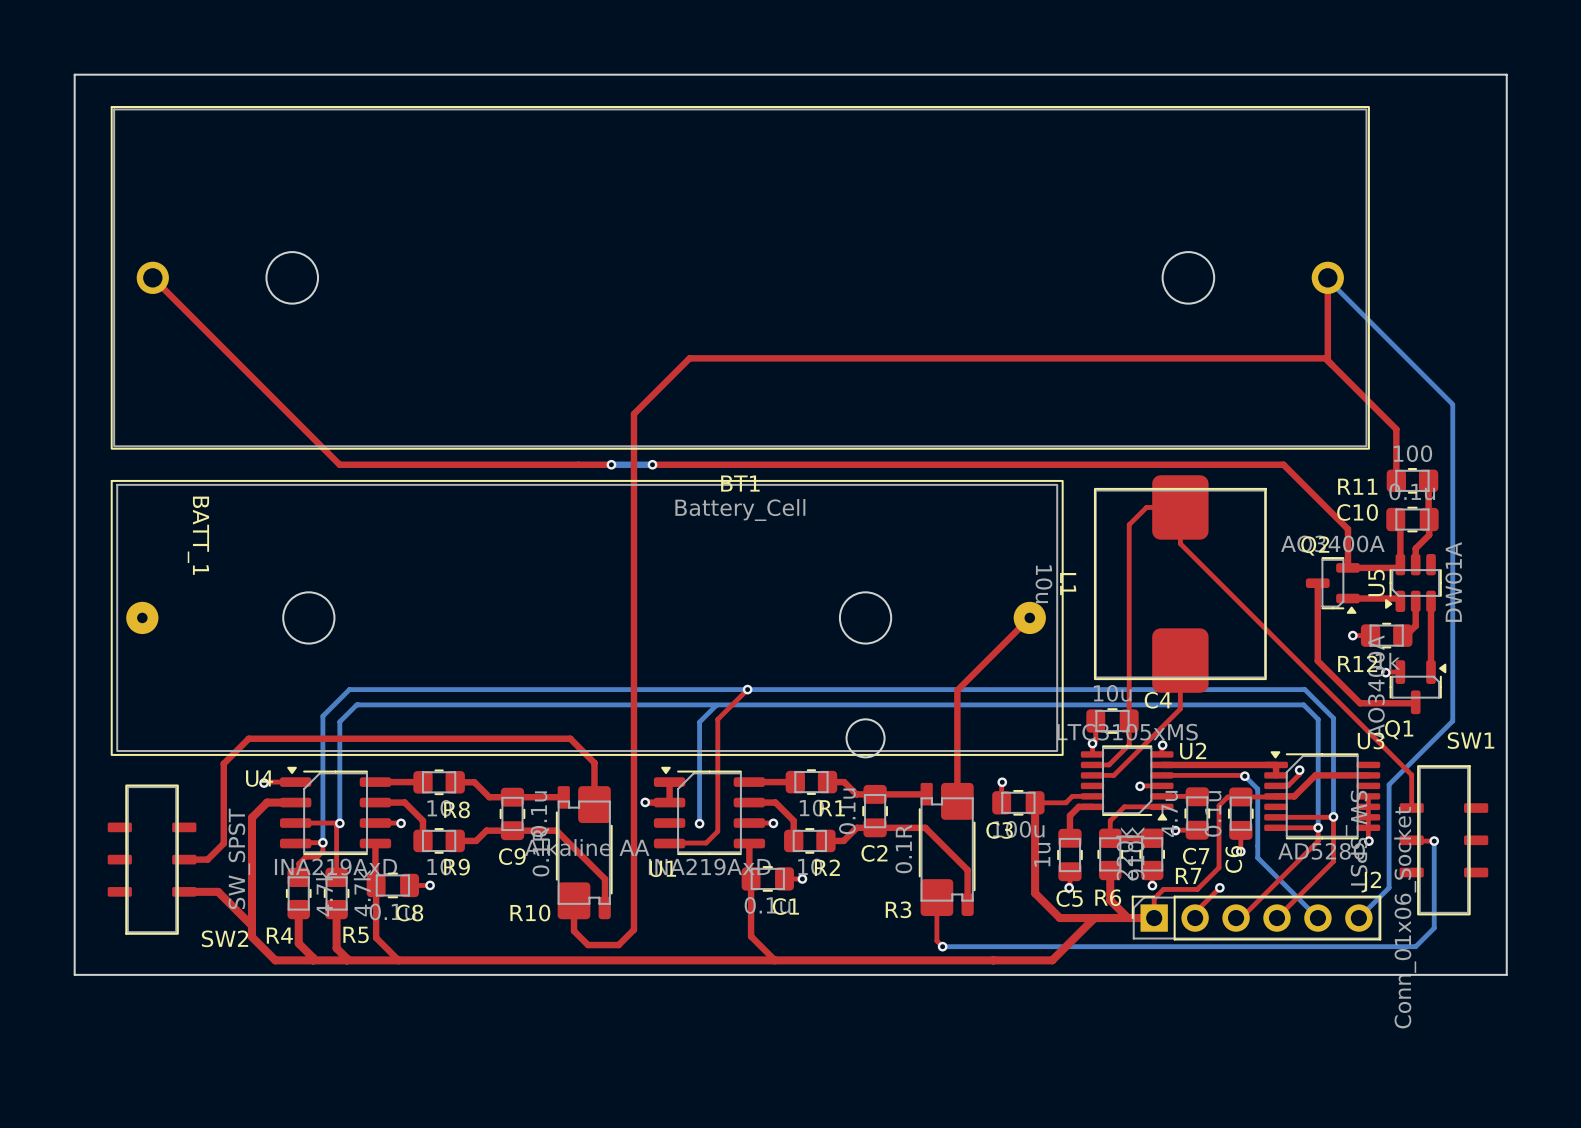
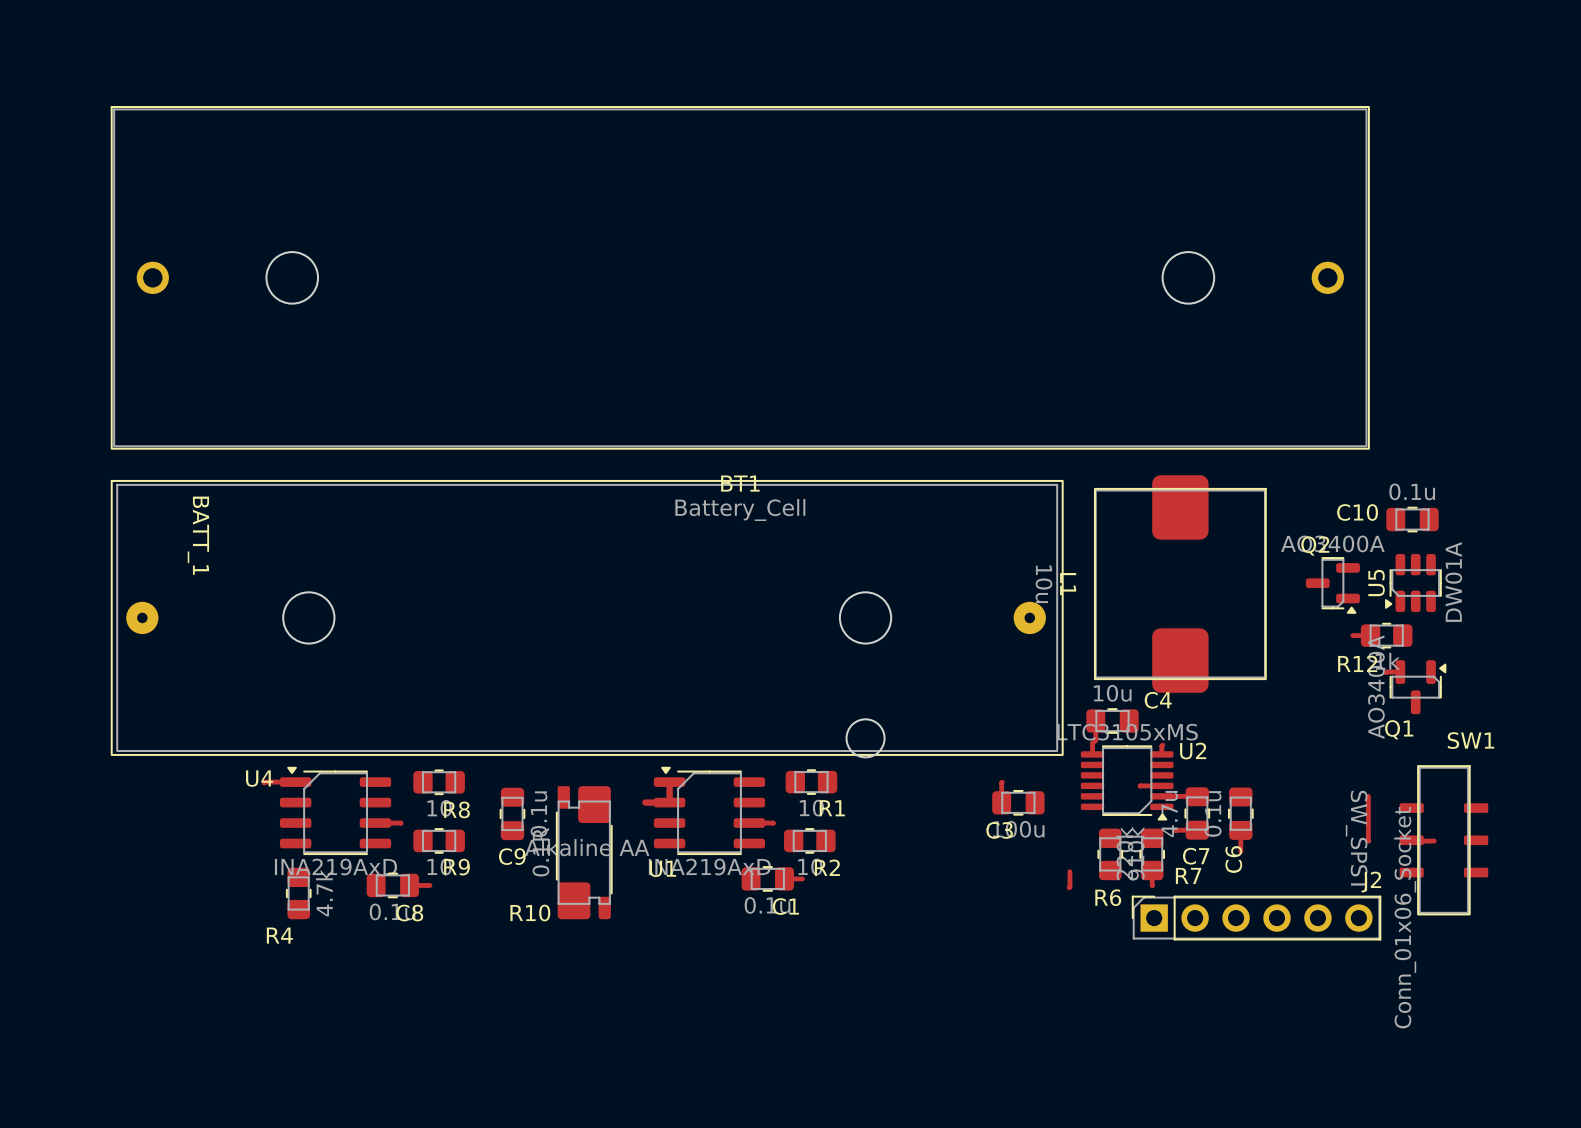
board edge: (74, 74) (1506, 74) (1506, 974) (74, 974) (74, 74) -> none
top track: (152, 277) (339, 464) (611, 464) -> none
top track: (1327, 277) (1327, 360) -> none
bottom track: (1327, 277) (1451, 403) -> none
bottom track: (1452, 404) (1452, 721) (1389, 784) (1389, 887) (1358, 918) -> none
bottom track: (611, 464) (652, 464) -> none
via: (611, 464) -> none
top track: (652, 464) (1283, 464) (1348, 529) (1348, 567) (1397, 567) (1400, 564) (1400, 524) (1395, 519) -> none
via: (652, 464) -> none
top track: (1396, 480) (1396, 429) (1325, 358) (689, 358) (633, 413) (633, 929) (618, 945) (588, 945) (574, 931) (574, 900) -> none
R11: 100 (1412, 480) -> none
top track: (1428, 480) (1429, 535) (1415, 548) (1415, 564) -> none
top track: (1317, 583) (1317, 660) (1360, 703) (1415, 702) -> none
top track: (1348, 598) (1397, 598) (1400, 601) -> none
top track: (1415, 601) (1415, 625) (1406, 635) (1402, 635) -> none
top track: (1431, 601) (1431, 672) -> none
top track: (1029, 617) (957, 690) (957, 801) -> none
via: (1352, 635) -> none
top track: (1180, 660) (1180, 708) (1113, 775) (1092, 775) -> none
via: (1385, 672) -> none
top track: (747, 689) (717, 719) (717, 831) (706, 843) (672, 843) -> none
via: (747, 689) -> none
bottom track: (716, 705) (699, 722) (699, 823) -> none
via: (1092, 743) -> none
via: (1162, 745) -> none
top track: (1092, 764) (1109, 764) (1129, 744) (1129, 524) (1146, 507) (1180, 507) (1180, 543) (1411, 775) (1411, 808) -> none
top track: (1161, 764) (1276, 764) (1276, 775) -> none
top track: (1299, 770) (1299, 774) (1287, 785) (1276, 785) -> none
via: (1299, 770) -> none
top track: (1161, 775) (1244, 776) -> none
top track: (1368, 775) (1315, 775) (1294, 796) (1227, 796) (1219, 805) (1219, 867) (1197, 889) (1163, 889) (1154, 898) (1154, 918) -> none
bottom track: (1244, 776) (1257, 789) (1257, 857) (1317, 918) -> none
via: (1244, 776) -> none
top track: (375, 782) (422, 782) -> none
top track: (455, 782) (474, 782) (489, 797) (563, 797) -> none
top track: (749, 782) (795, 782) -> none
top track: (827, 782) (844, 782) (856, 794) (926, 794) -> none
via: (1002, 782) -> none
via: (264, 783) -> none
via: (1140, 786) -> none
U3: AD5280 (1322, 795) -> none
top track: (1092, 796) (1072, 796) (1065, 802) (1035, 802) (1035, 893) (1059, 918) (1154, 918) -> none
top track: (295, 802) (267, 802) (251, 817) (251, 936) (275, 960) (1052, 960) (1094, 918) -> none
top track: (375, 802) (404, 802) (422, 820) (422, 840) -> none
via: (645, 802) -> none
top track: (749, 802) (775, 802) (793, 820) (793, 840) -> none
top track: (594, 804) (594, 762) (570, 738) (248, 738) (223, 763) (223, 843) (207, 859) (184, 859) -> none
top track: (1092, 806) (1078, 806) (1069, 815) (1069, 838) -> none
top track: (1161, 806) (1124, 806) (1110, 820) (1110, 838) (1152, 838) -> none
C2: 0.1u (875, 811) -> none
bottom track: (1333, 816) (1333, 718) (1304, 689) (349, 689) (322, 716) (322, 842) -> none
via: (1333, 816) -> none
top track: (1276, 817) (1333, 816) (1333, 861) (1277, 918) -> none
top track: (295, 823) (339, 823) (336, 826) (336, 877) -> none
bottom track: (339, 823) (339, 721) (356, 704) (1303, 704) (1318, 719) (1318, 827) -> none
via: (339, 823) -> none
via: (401, 823) -> none
via: (699, 823) -> none
via: (773, 823) -> none
top track: (1276, 827) (1318, 827) (1318, 841) (1240, 918) (1236, 918) -> none
via: (1318, 827) -> none
via: (1175, 830) -> none
top track: (455, 840) (476, 840) (486, 830) (556, 830) (605, 879) (604, 907) -> none
top track: (825, 840) (843, 840) (856, 827) (925, 827) (967, 870) (967, 904) -> none
via: (1368, 841) -> none
bottom track: (1434, 841) (1434, 928) (1415, 946) (942, 946) -> none
via: (1434, 841) -> none
via: (322, 842) -> none
top track: (295, 843) (322, 842) (322, 851) (317, 857) (305, 857) (298, 863) (298, 877) -> none
top track: (375, 843) (376, 937) (398, 960) -> none
top track: (749, 843) (751, 936) (775, 960) -> none
R3: 0.1R (947, 849) -> none
via: (1240, 851) -> none
C5: 1u (1069, 854) -> none
SW2: SW_SPST (152, 859) -> none
top track: (1110, 870) (1110, 900) (1127, 918) -> none
via: (802, 878) -> none
via: (430, 885) -> none
via: (1152, 885) -> none
via: (1069, 887) -> none
top track: (1219, 887) (1195, 912) (1194, 917) -> none
via: (1219, 887) -> none
top track: (184, 891) (218, 891) (251, 925) -> none
R5: 4.7k (336, 893) -> none
top track: (936, 897) (936, 940) (942, 946) -> none
top track: (298, 909) (298, 943) (313, 957) (313, 960) -> none
top track: (336, 909) (336, 948) (347, 960) -> none
via: (942, 946) -> none

